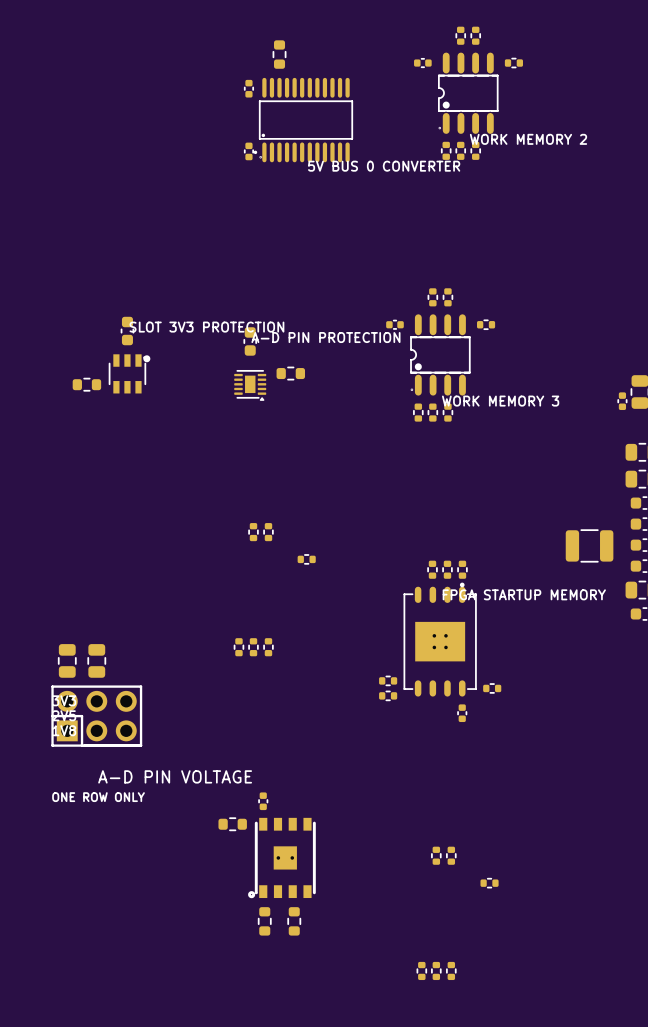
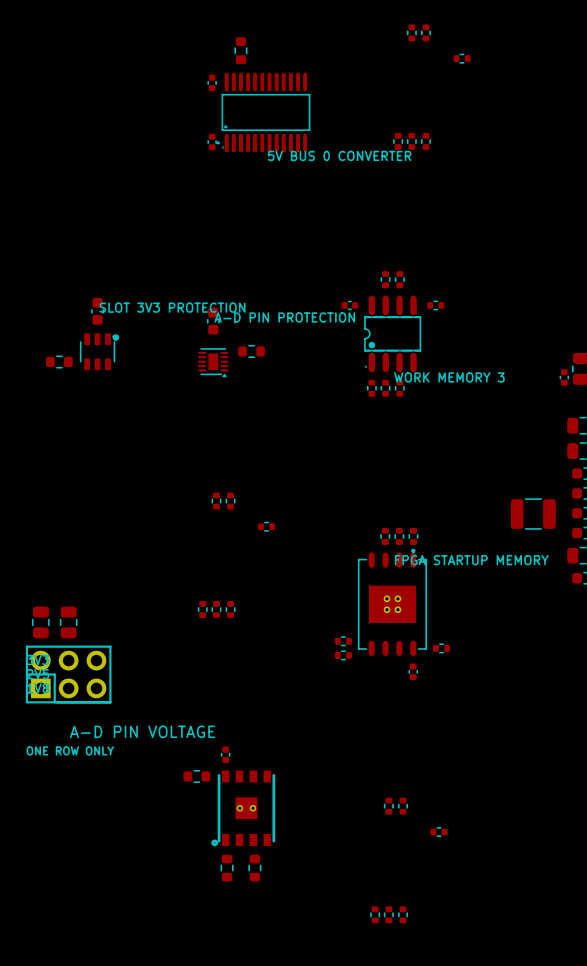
part: (422, 63) -> none
part: (468, 93) -> none

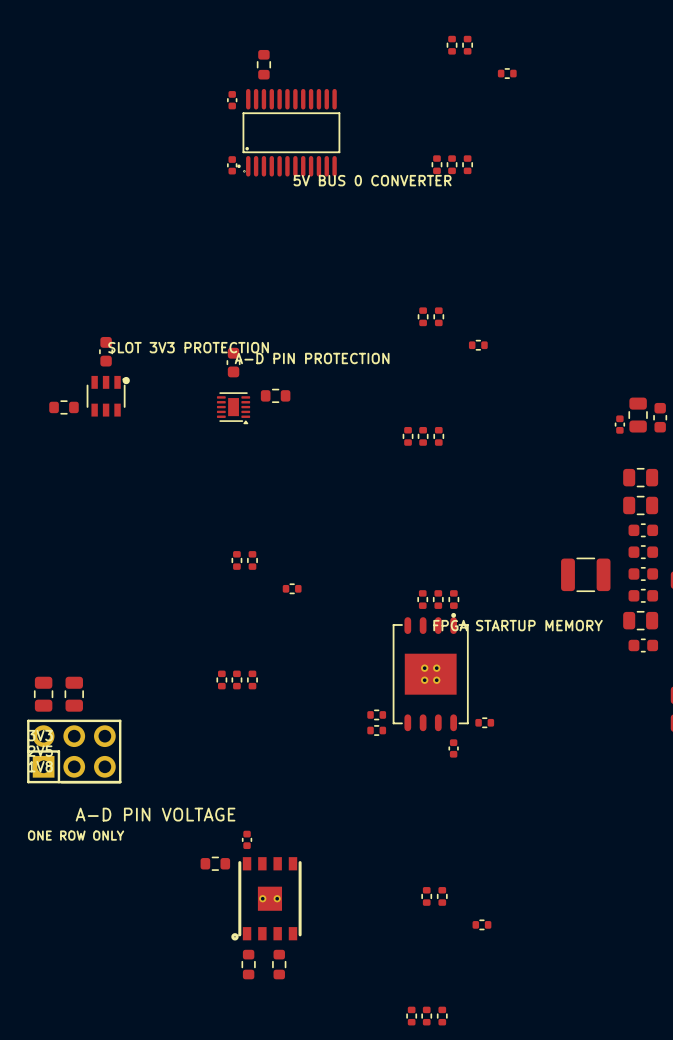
part: (349, 305) -> none
part: (392, 333) -> none

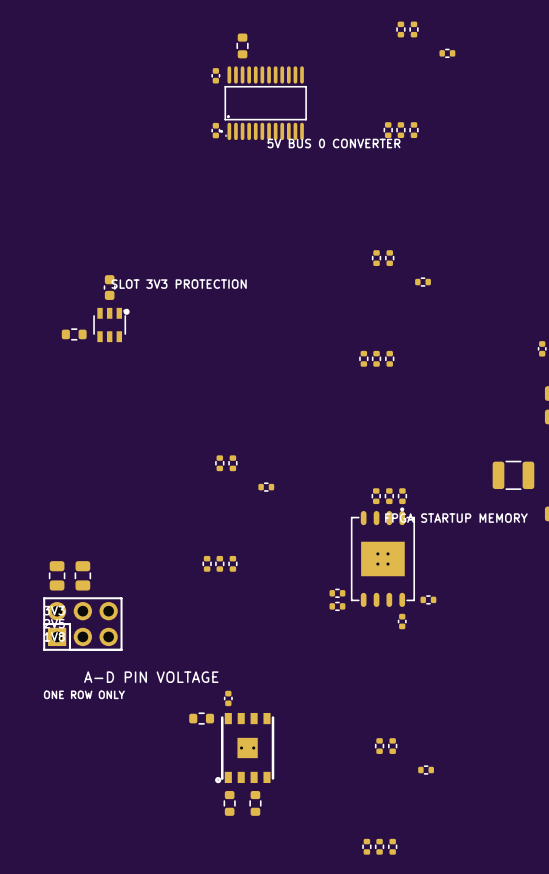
part: (233, 362) -> none
part: (275, 395) -> none
part: (233, 408) -> none

